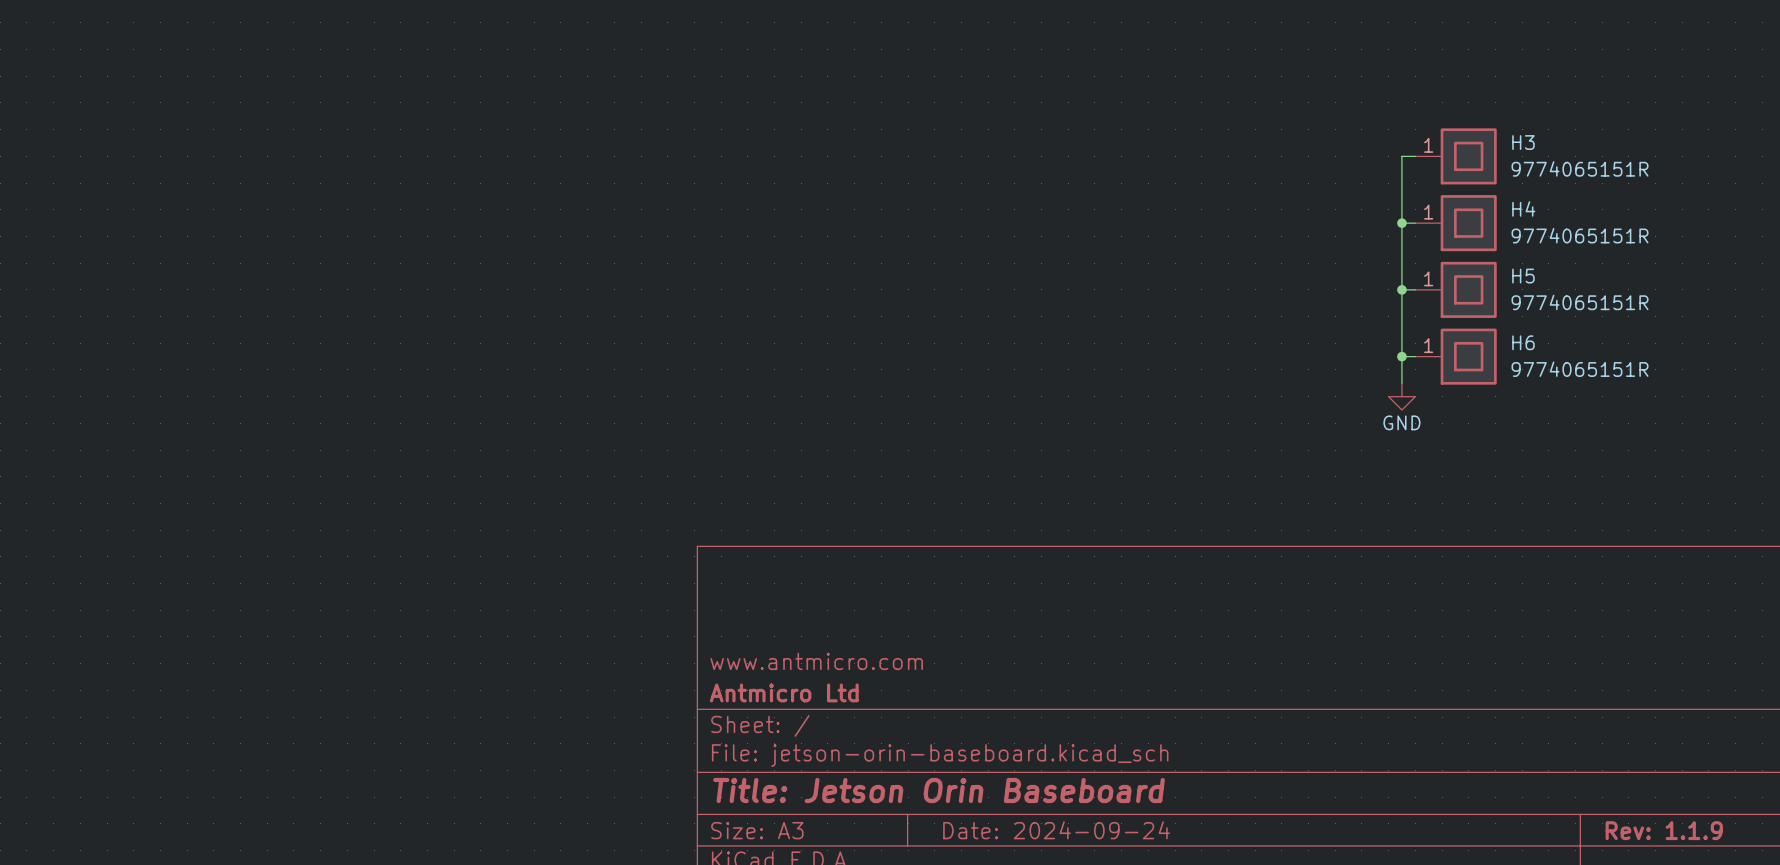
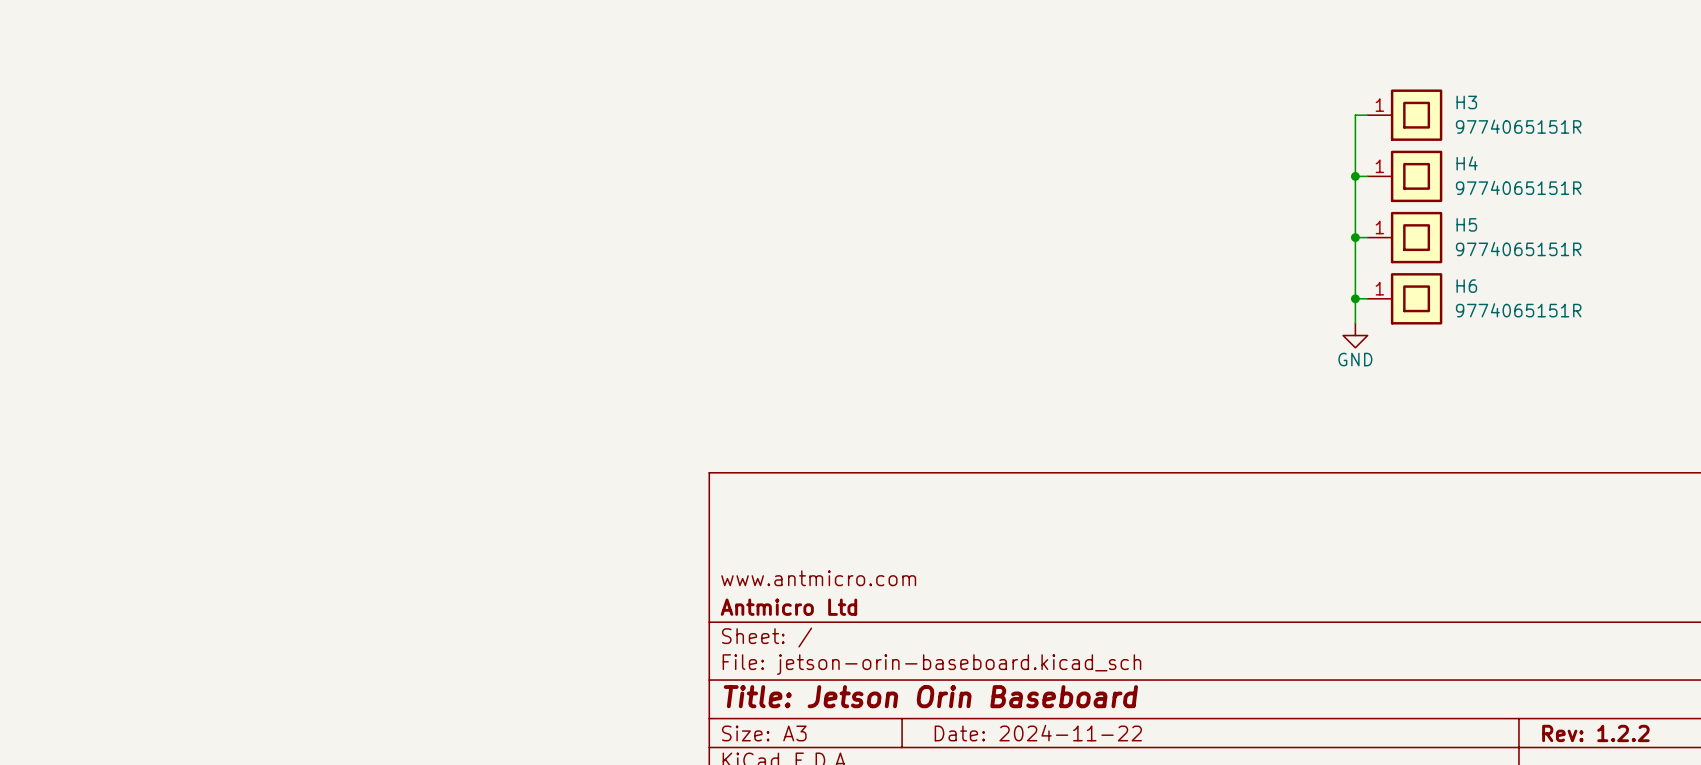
title block: Date: 2024-09-24 (1056, 830) -> Date: 2024-11-22 (1038, 733)
title block: Rev: 1.1.9 (1664, 830) -> Rev: 1.2.2 (1595, 733)

